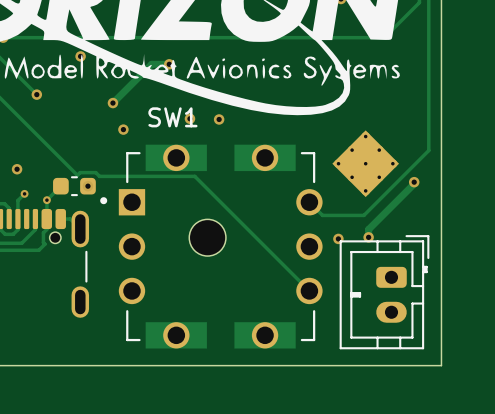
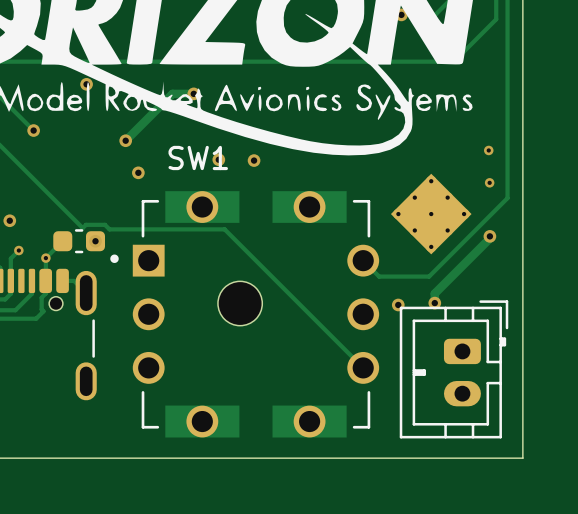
via: none -> (488, 150)
via: none -> (489, 182)

